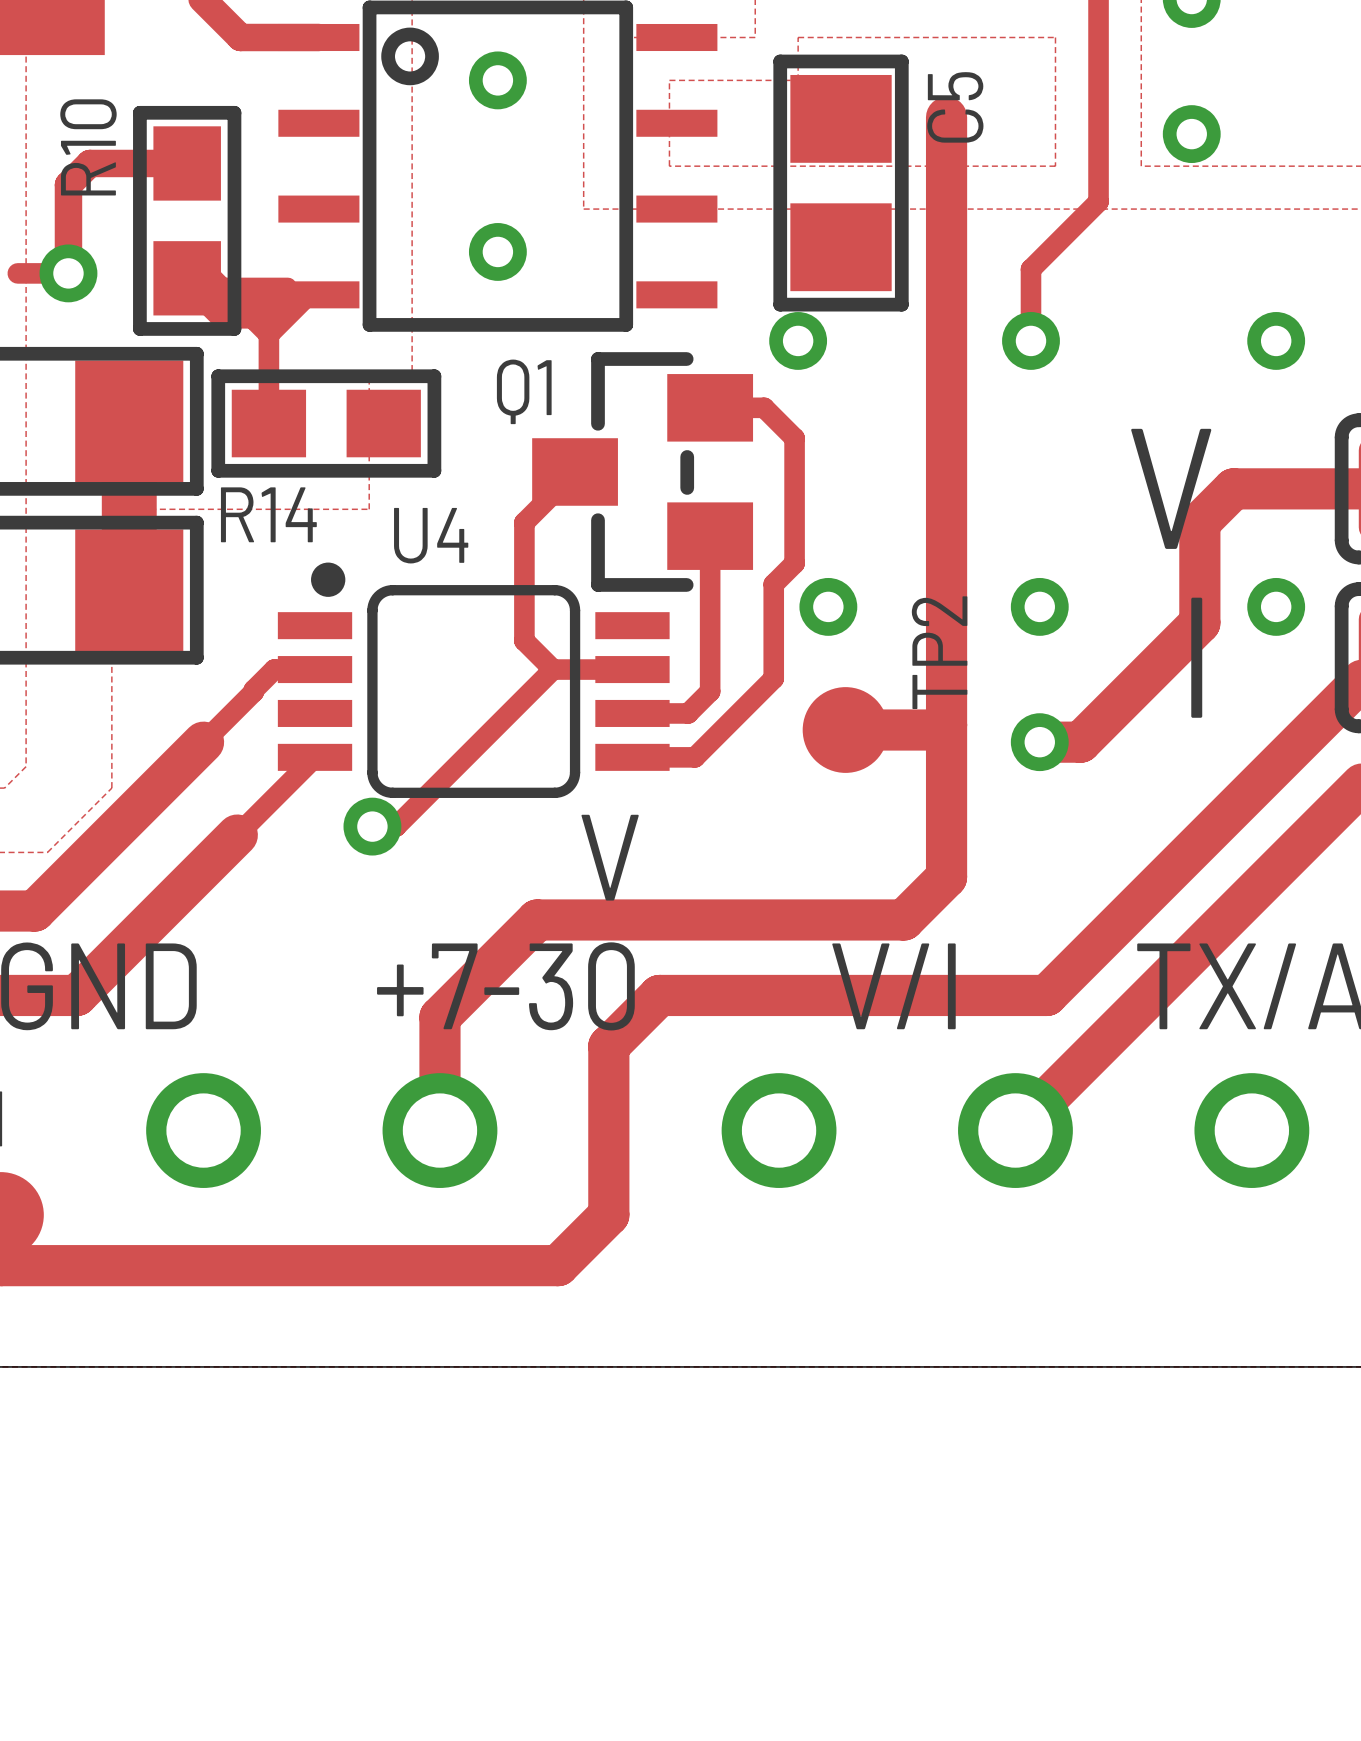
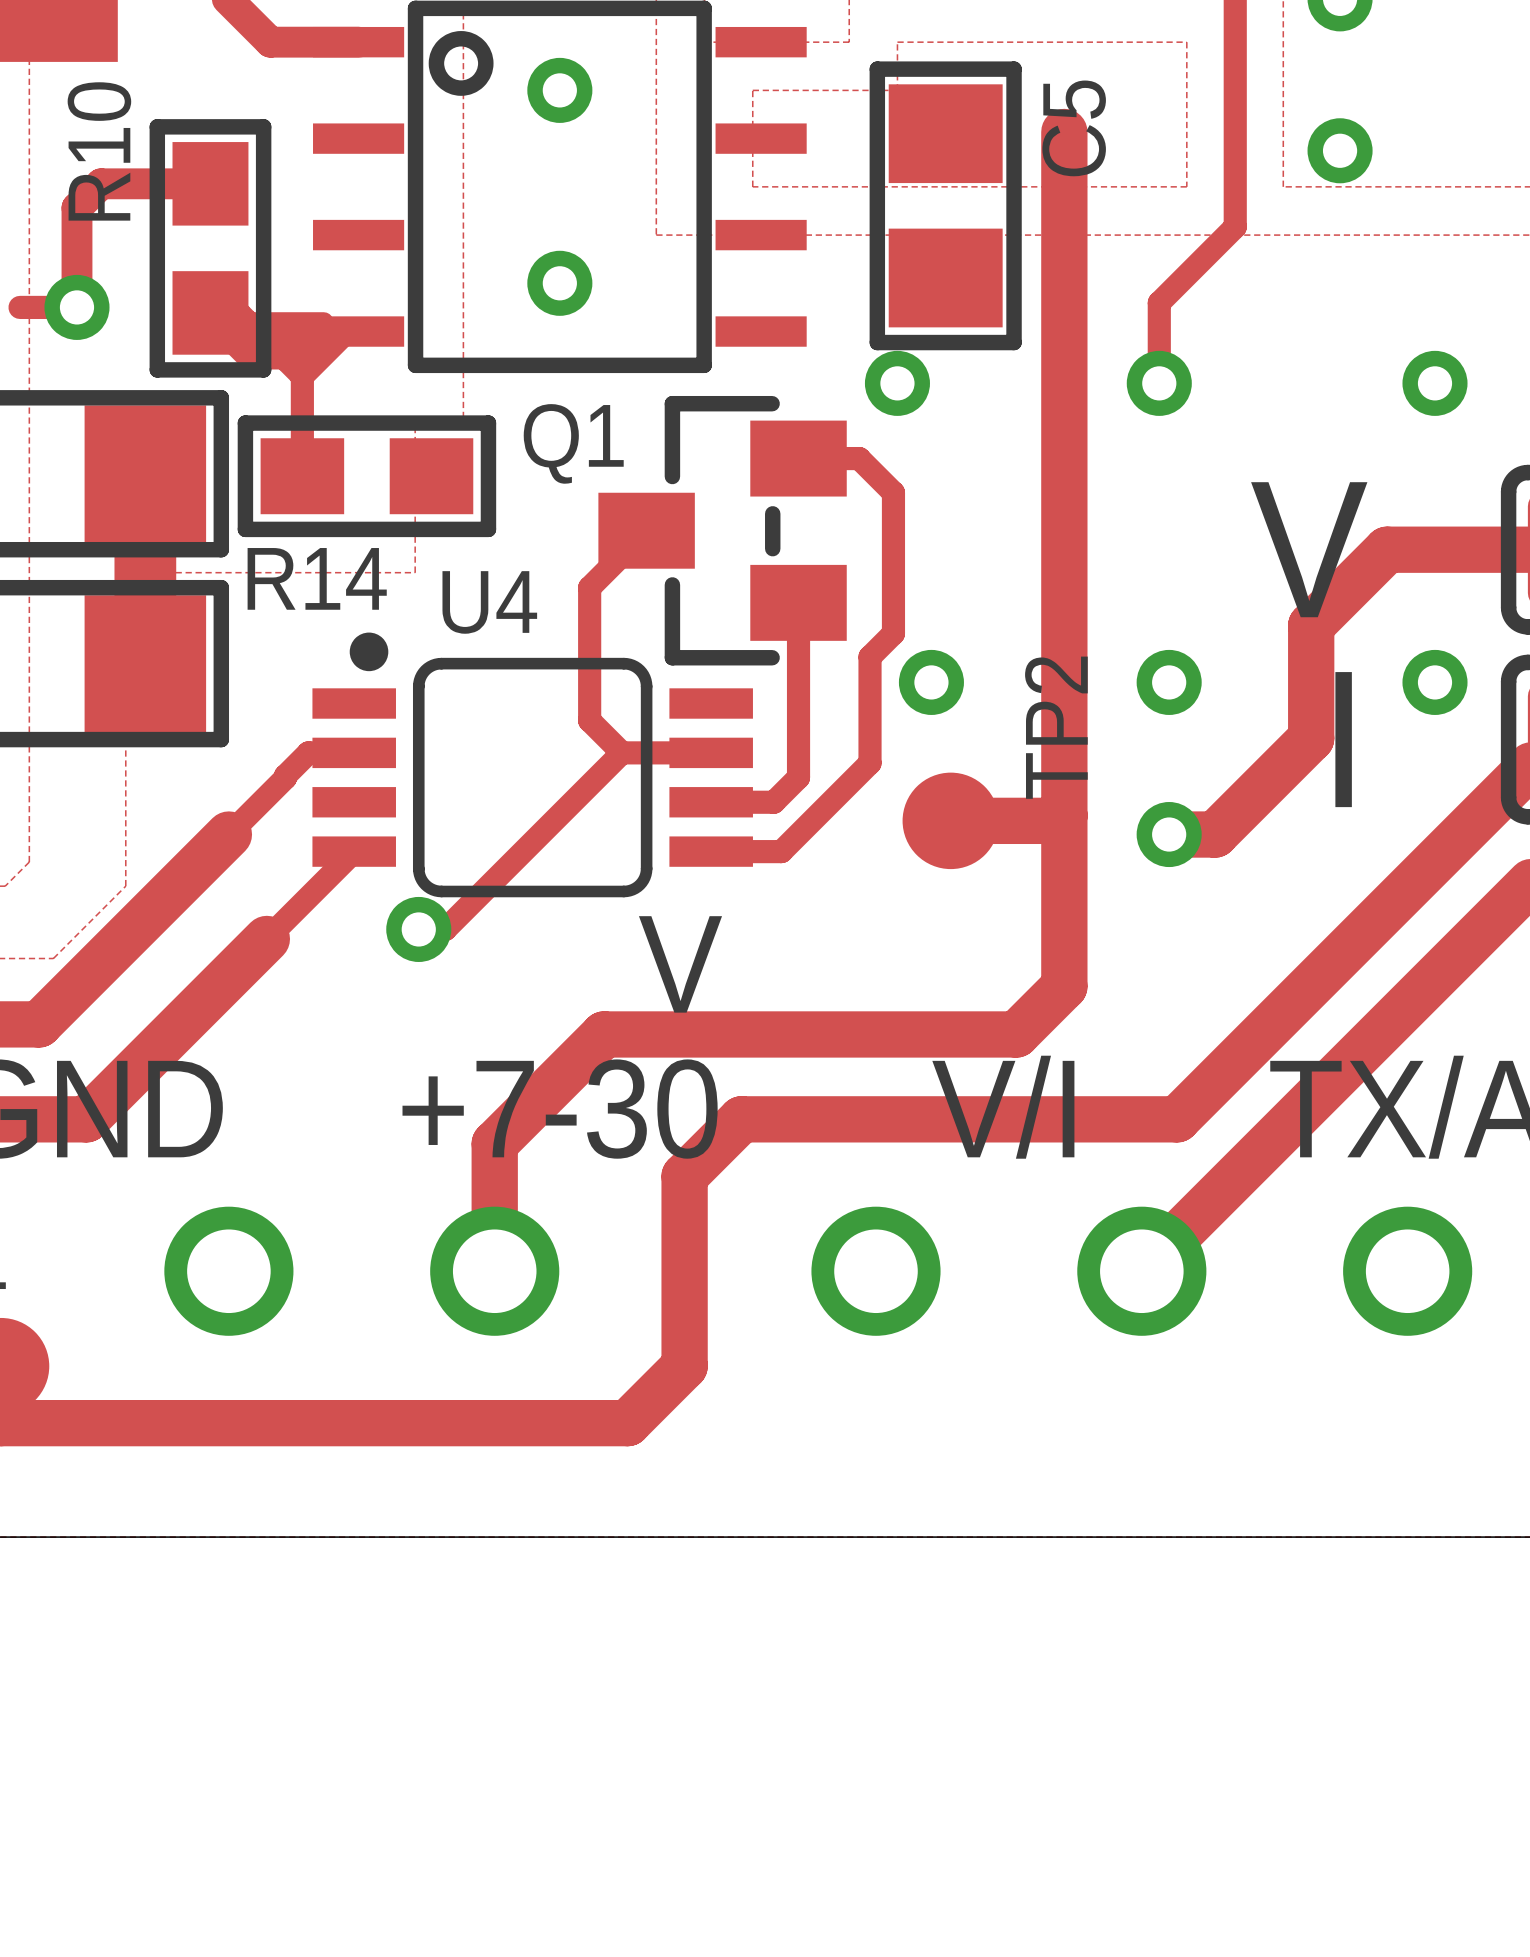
track: (1199, 522) (1199, 622) (1166, 656) -> (1349, 587) (1311, 625) (1311, 738)

